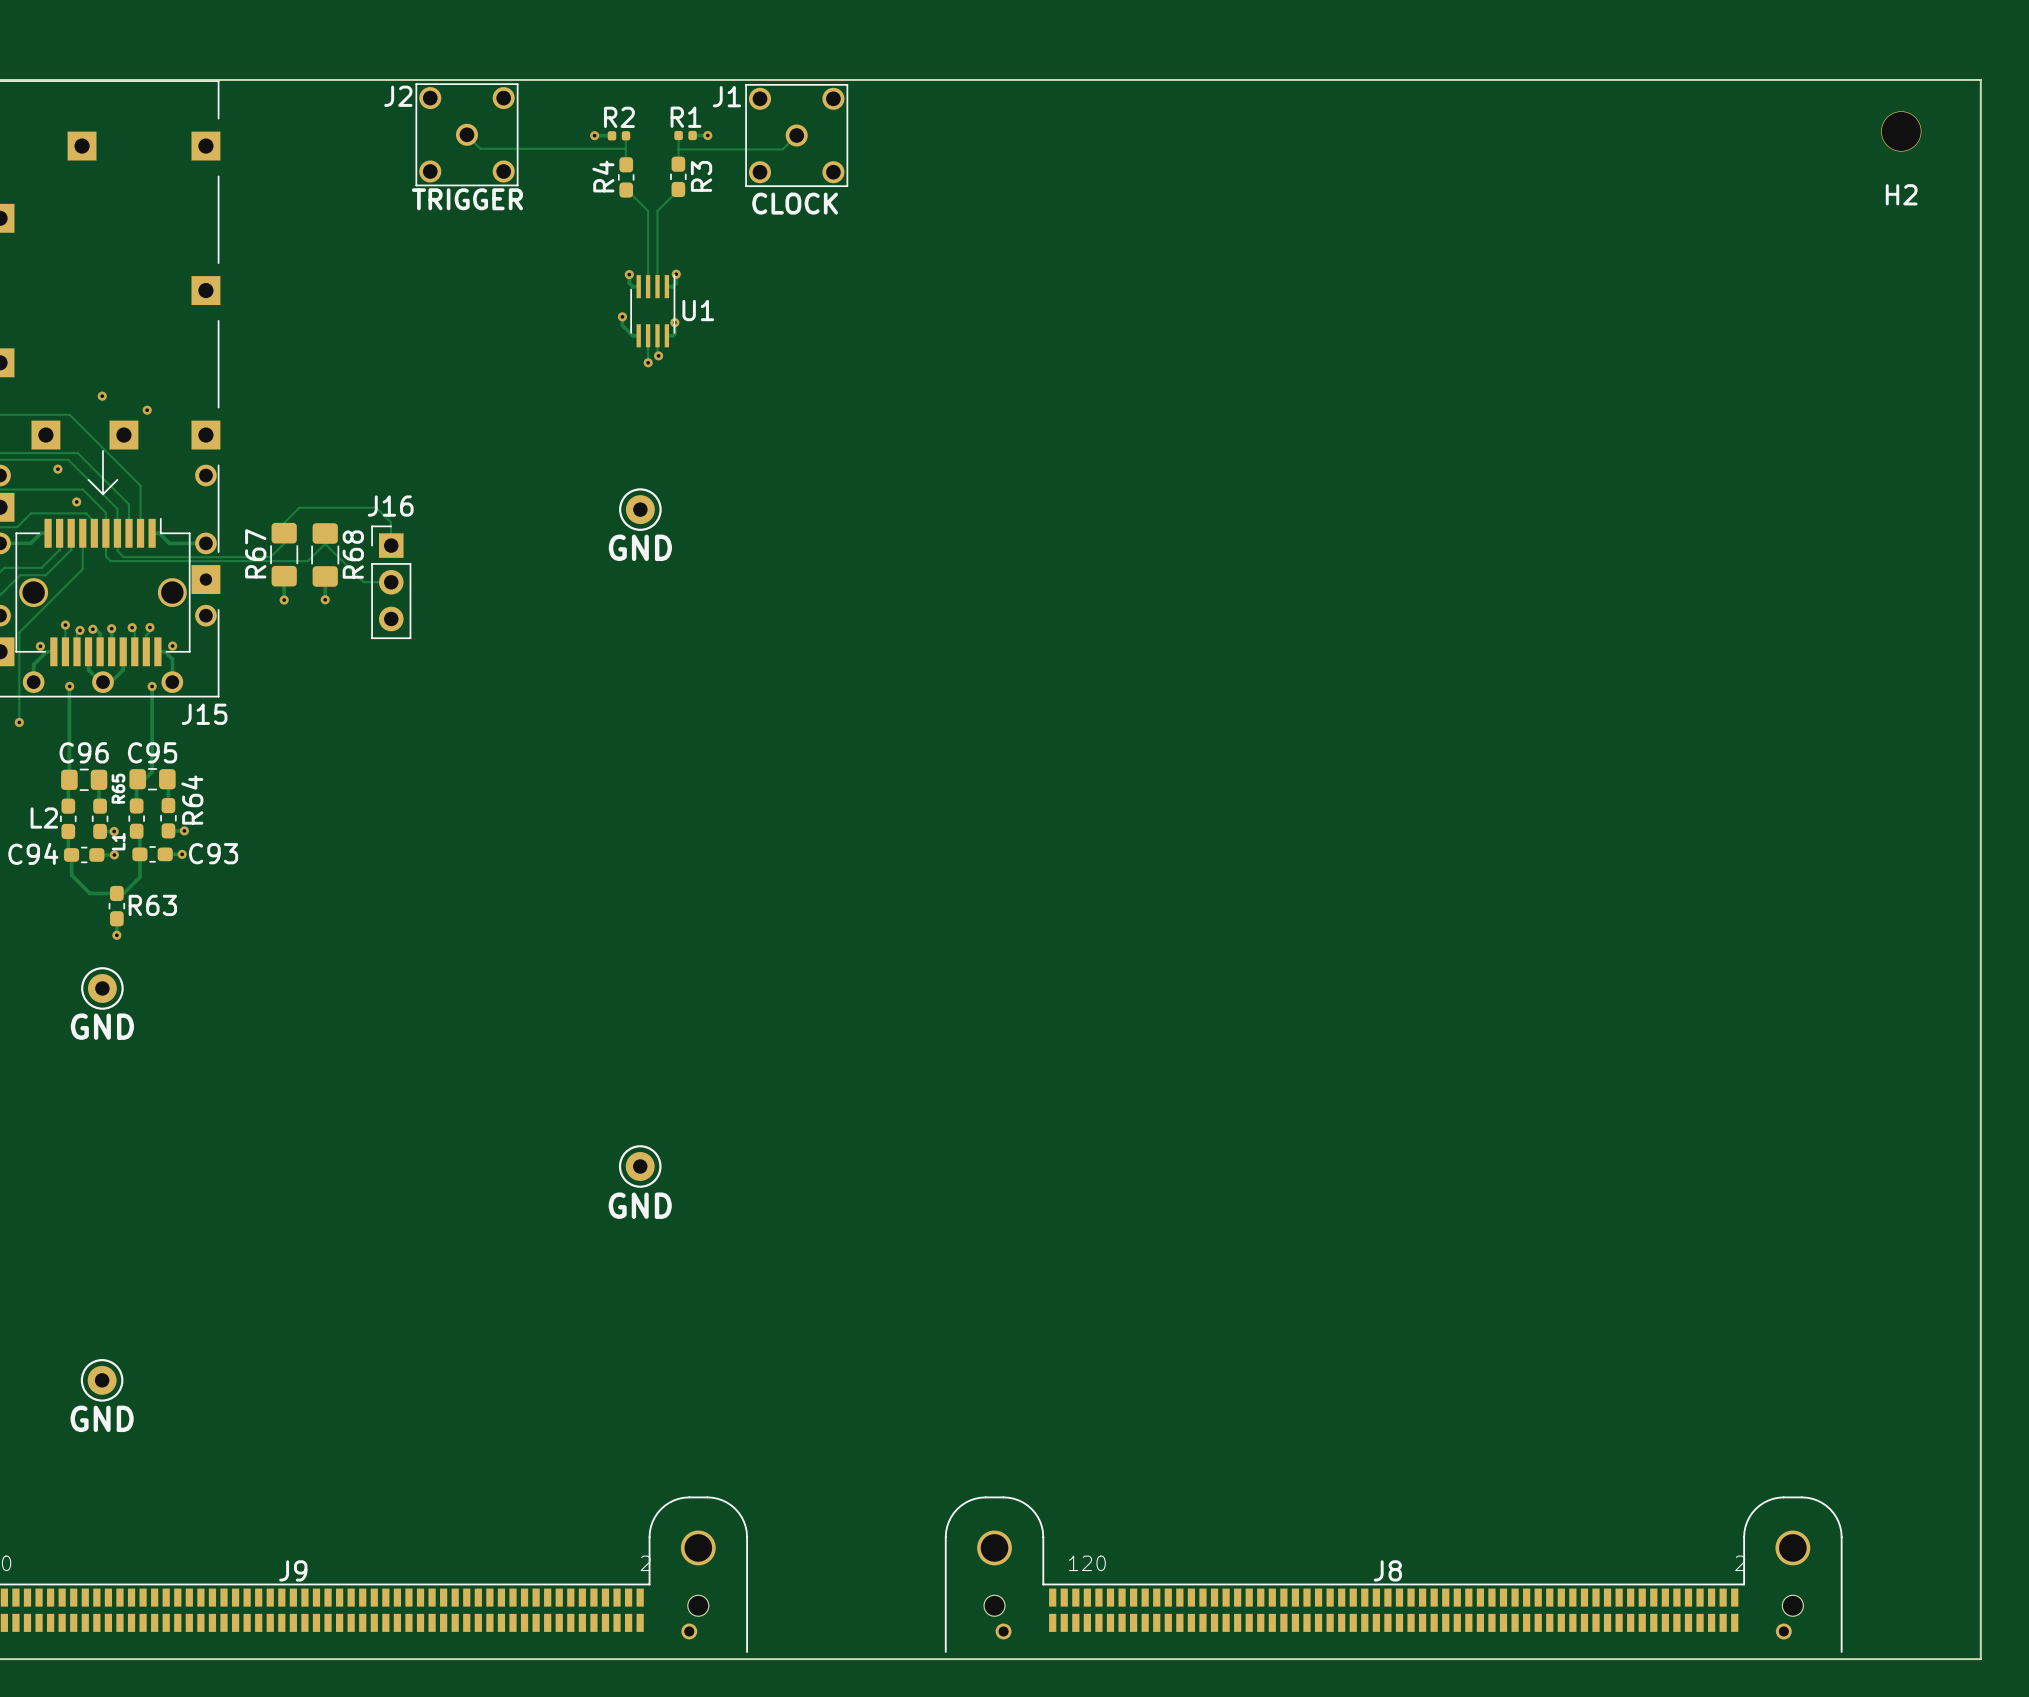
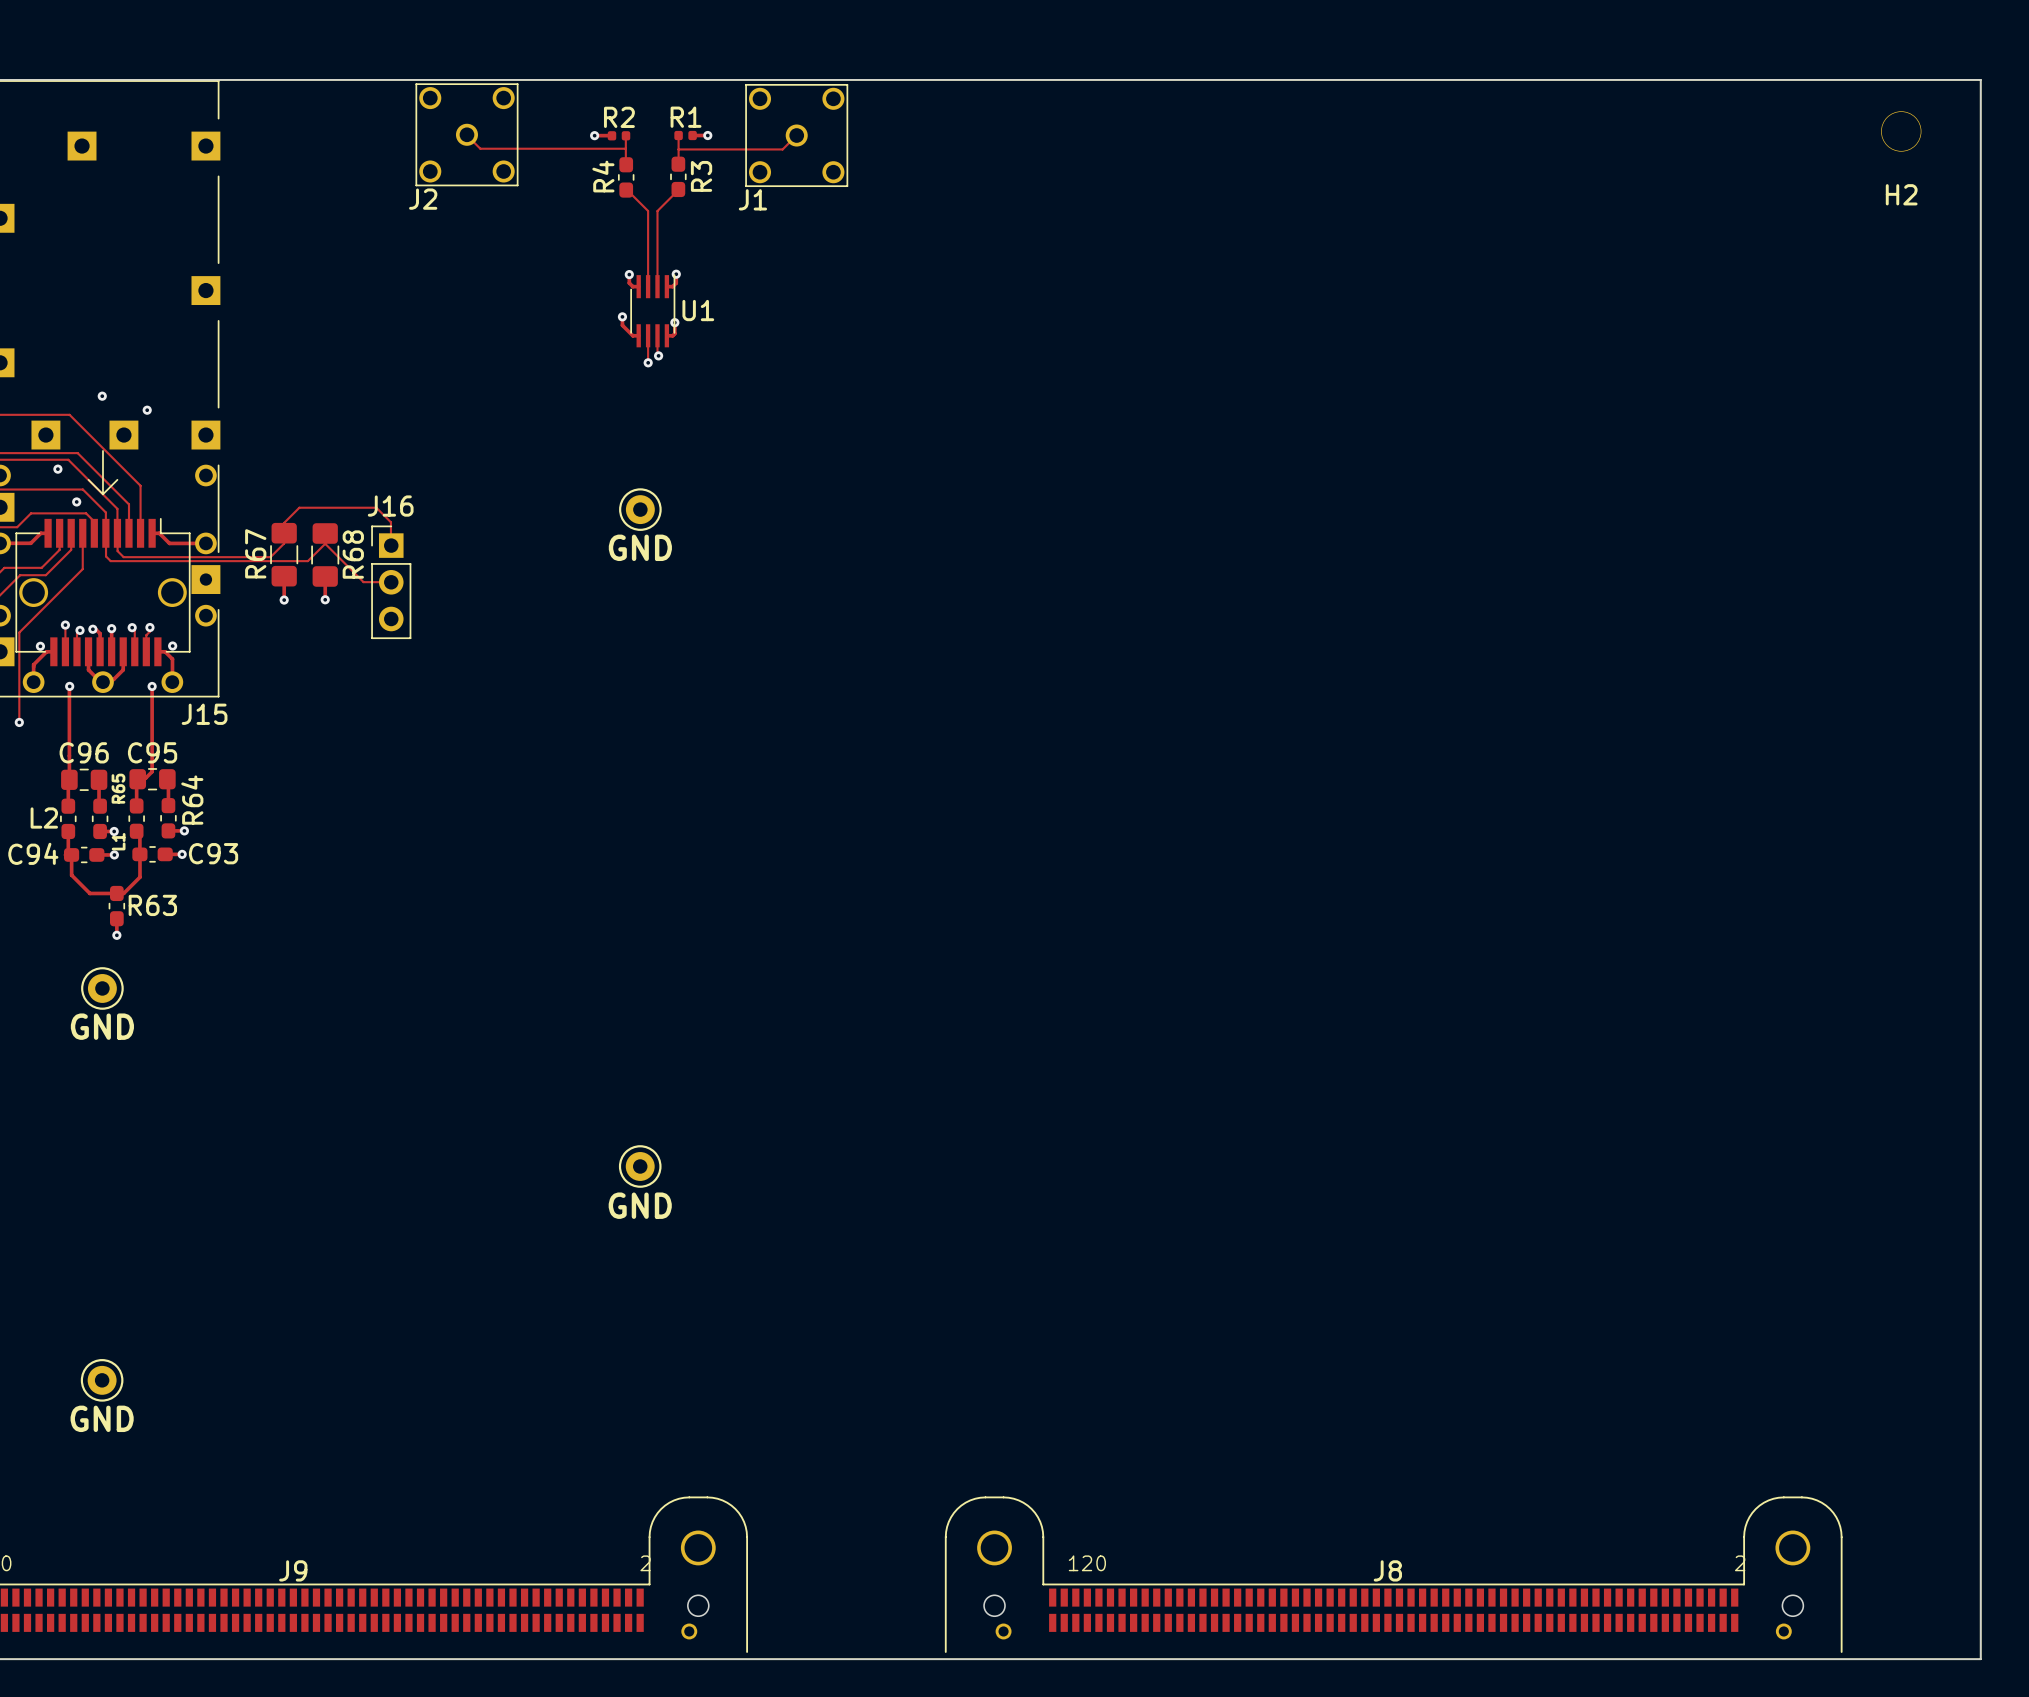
J2 name position: J2 (398, 96) -> J2 (423, 199)
J1 name position: J1 (726, 96) -> J1 (752, 199)
text: TRIGGER (467, 199) -> none
text: CLOCK (795, 203) -> none

